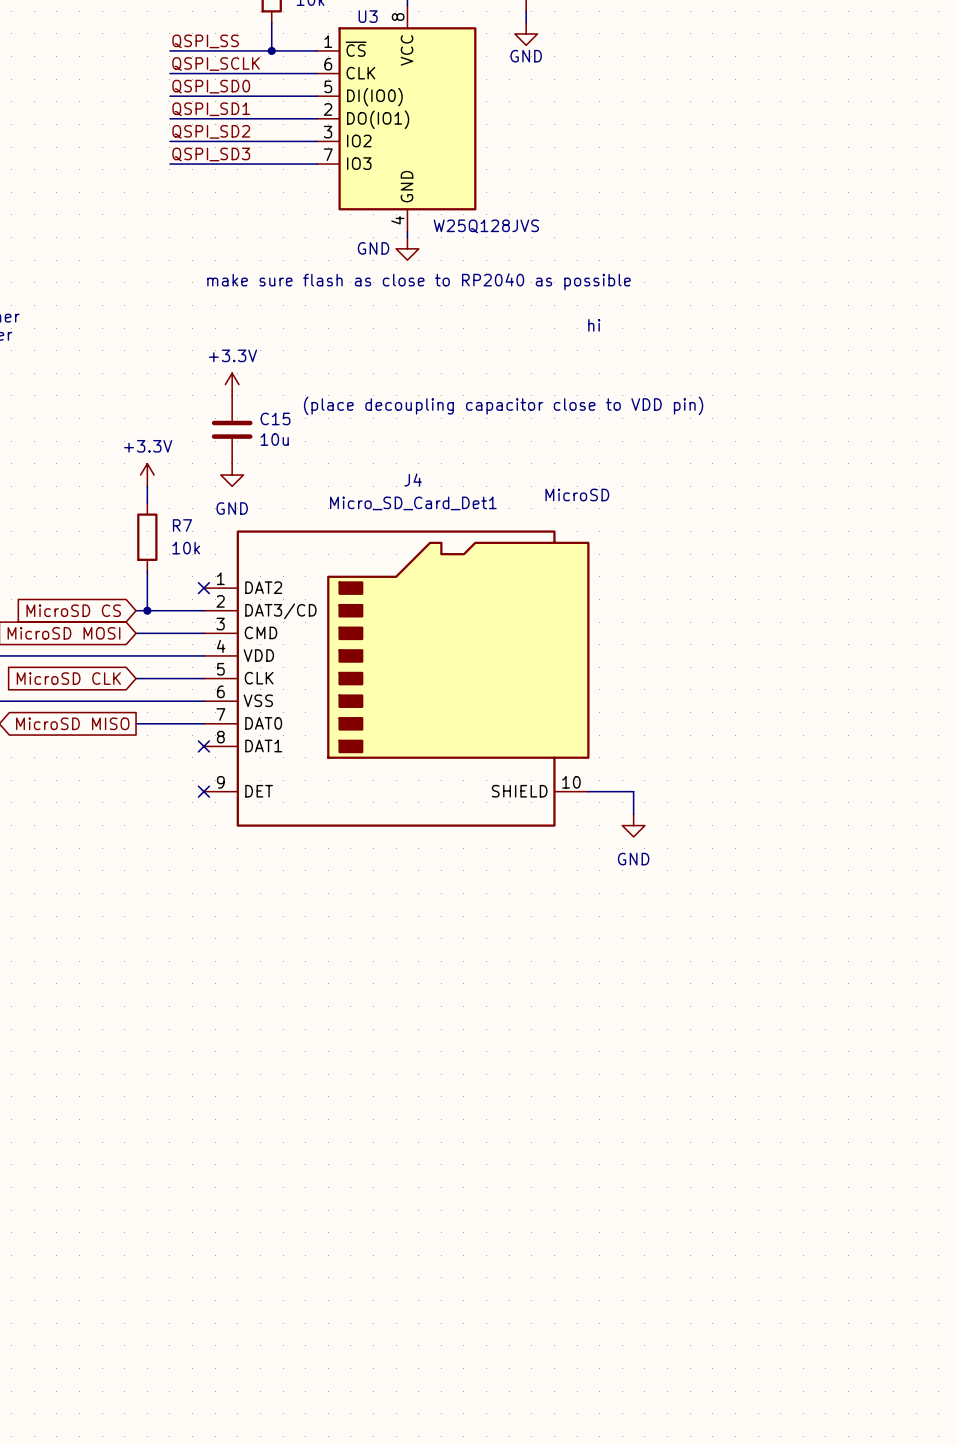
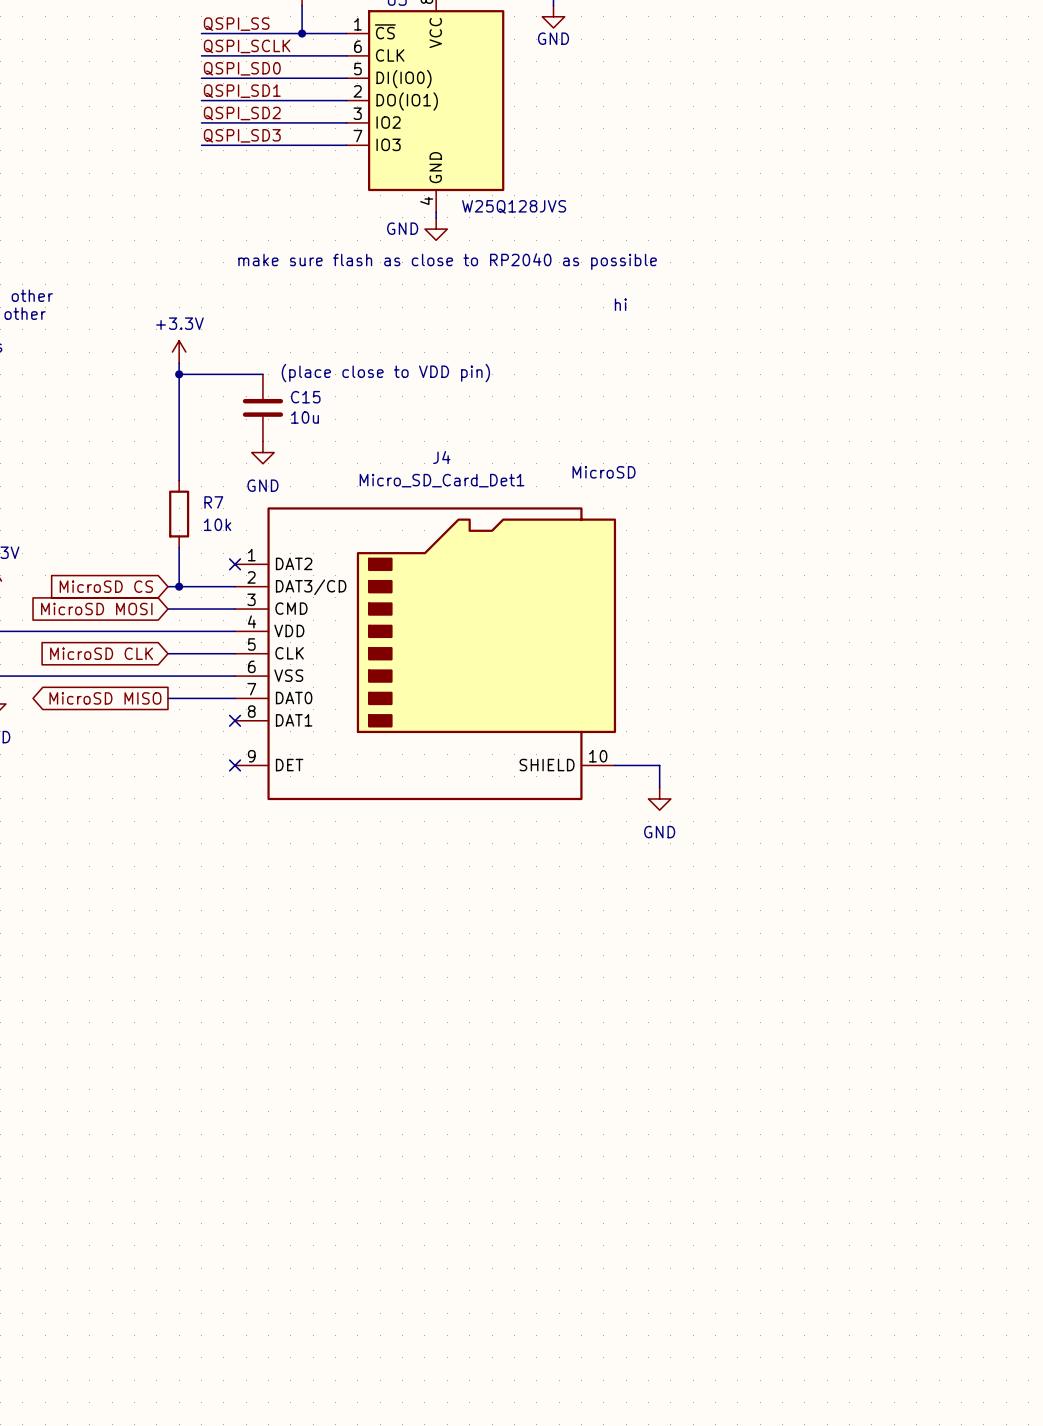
power symbol: none -> +3.3V (179, 352)
wire: none -> (179, 363) (179, 463)
power symbol: +3.3V (232, 384) -> none
wire: none -> (179, 374) (262, 374)
junction: none -> (179, 374)
text: (place decoupling capacitor close to VDD pin) (503, 405) -> (place close to VDD pin) (385, 373)
power symbol: +3.3V (147, 475) -> none

